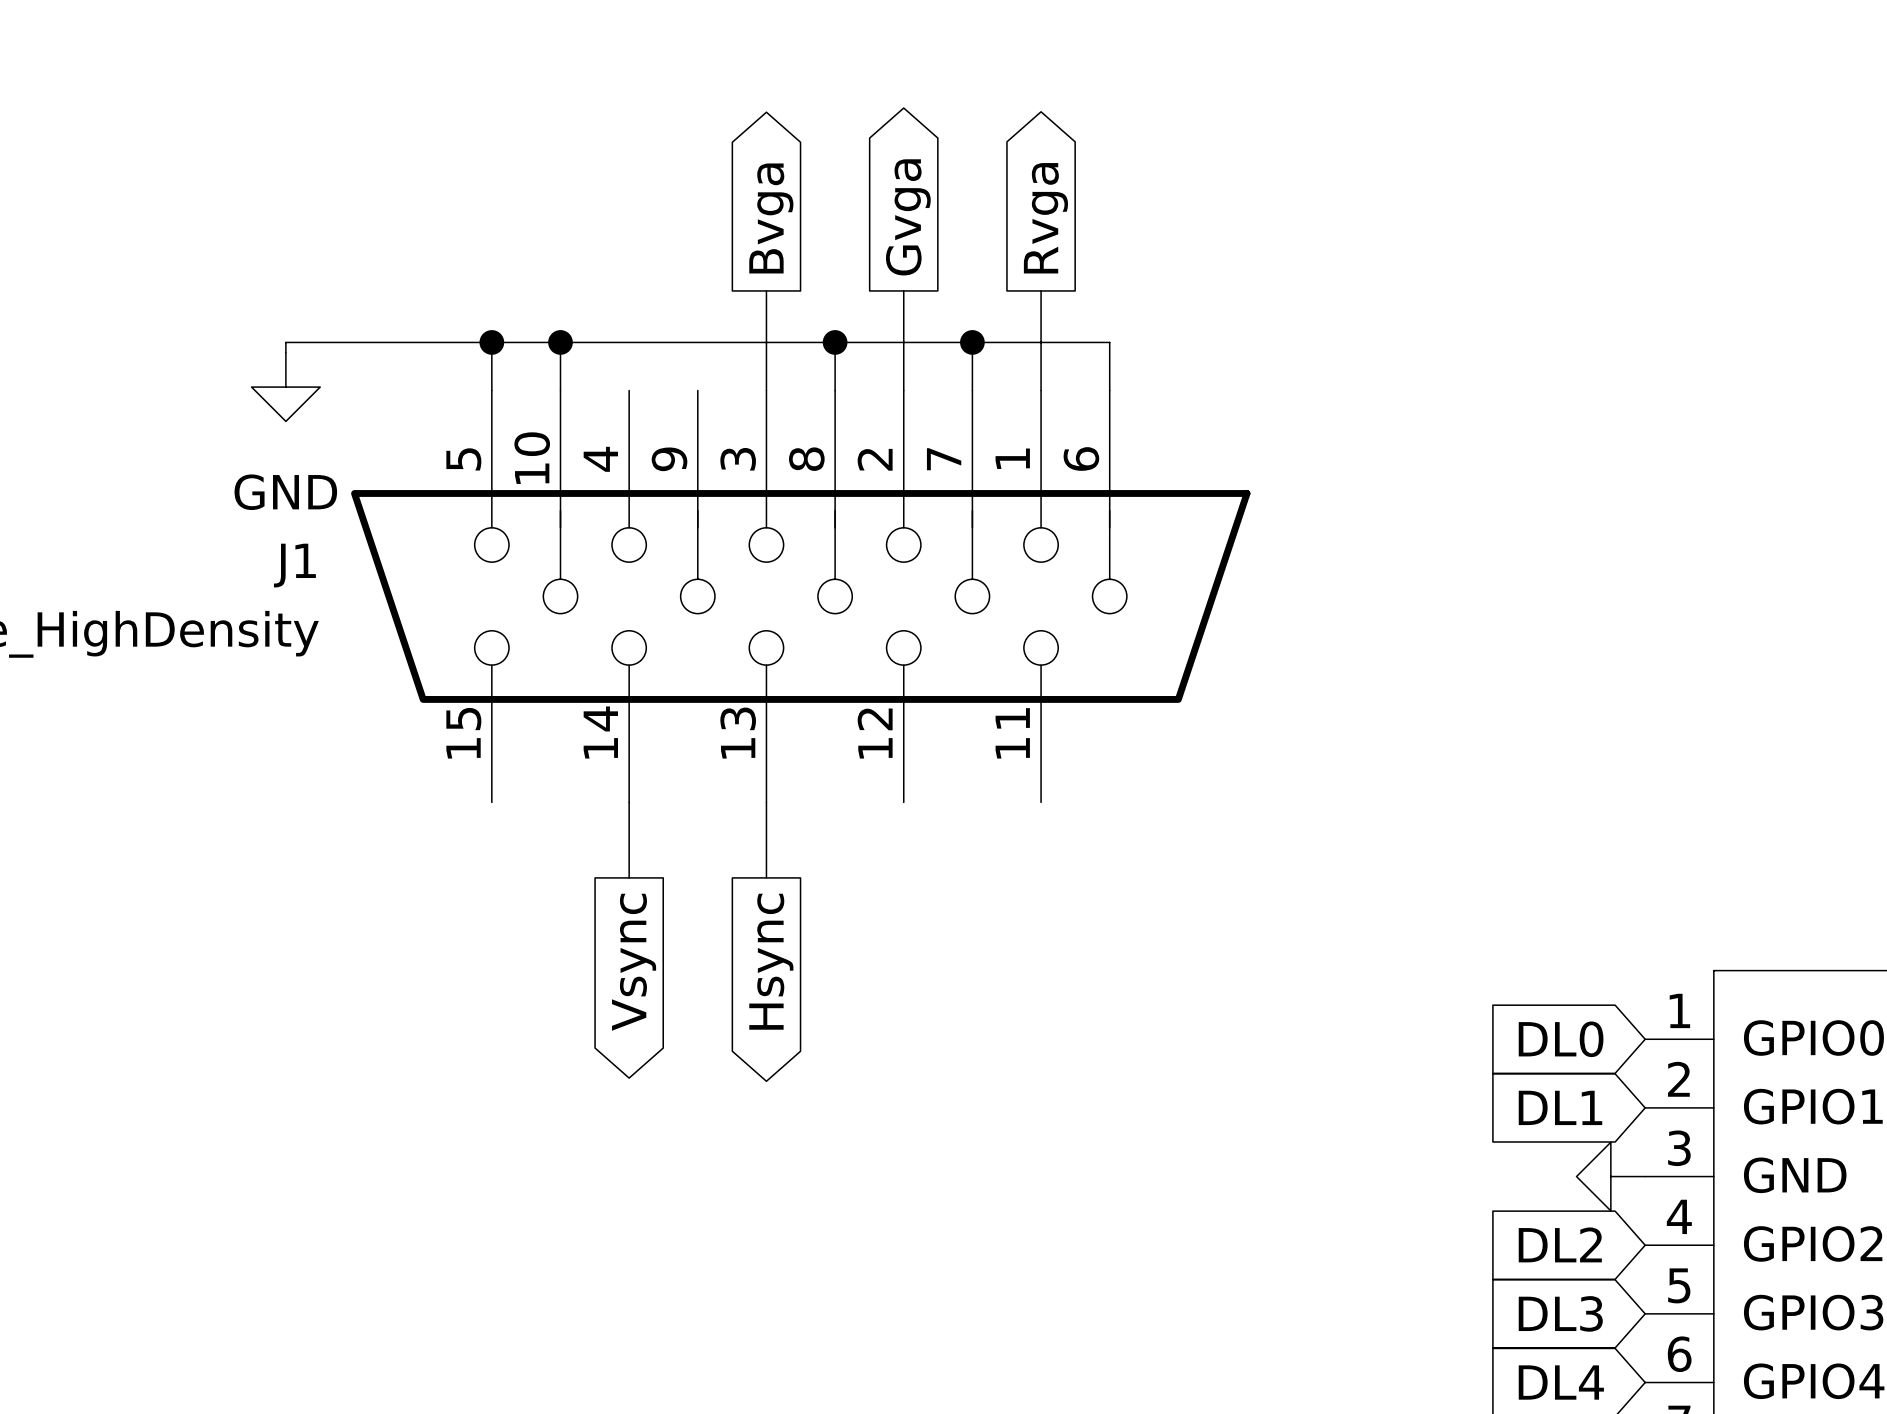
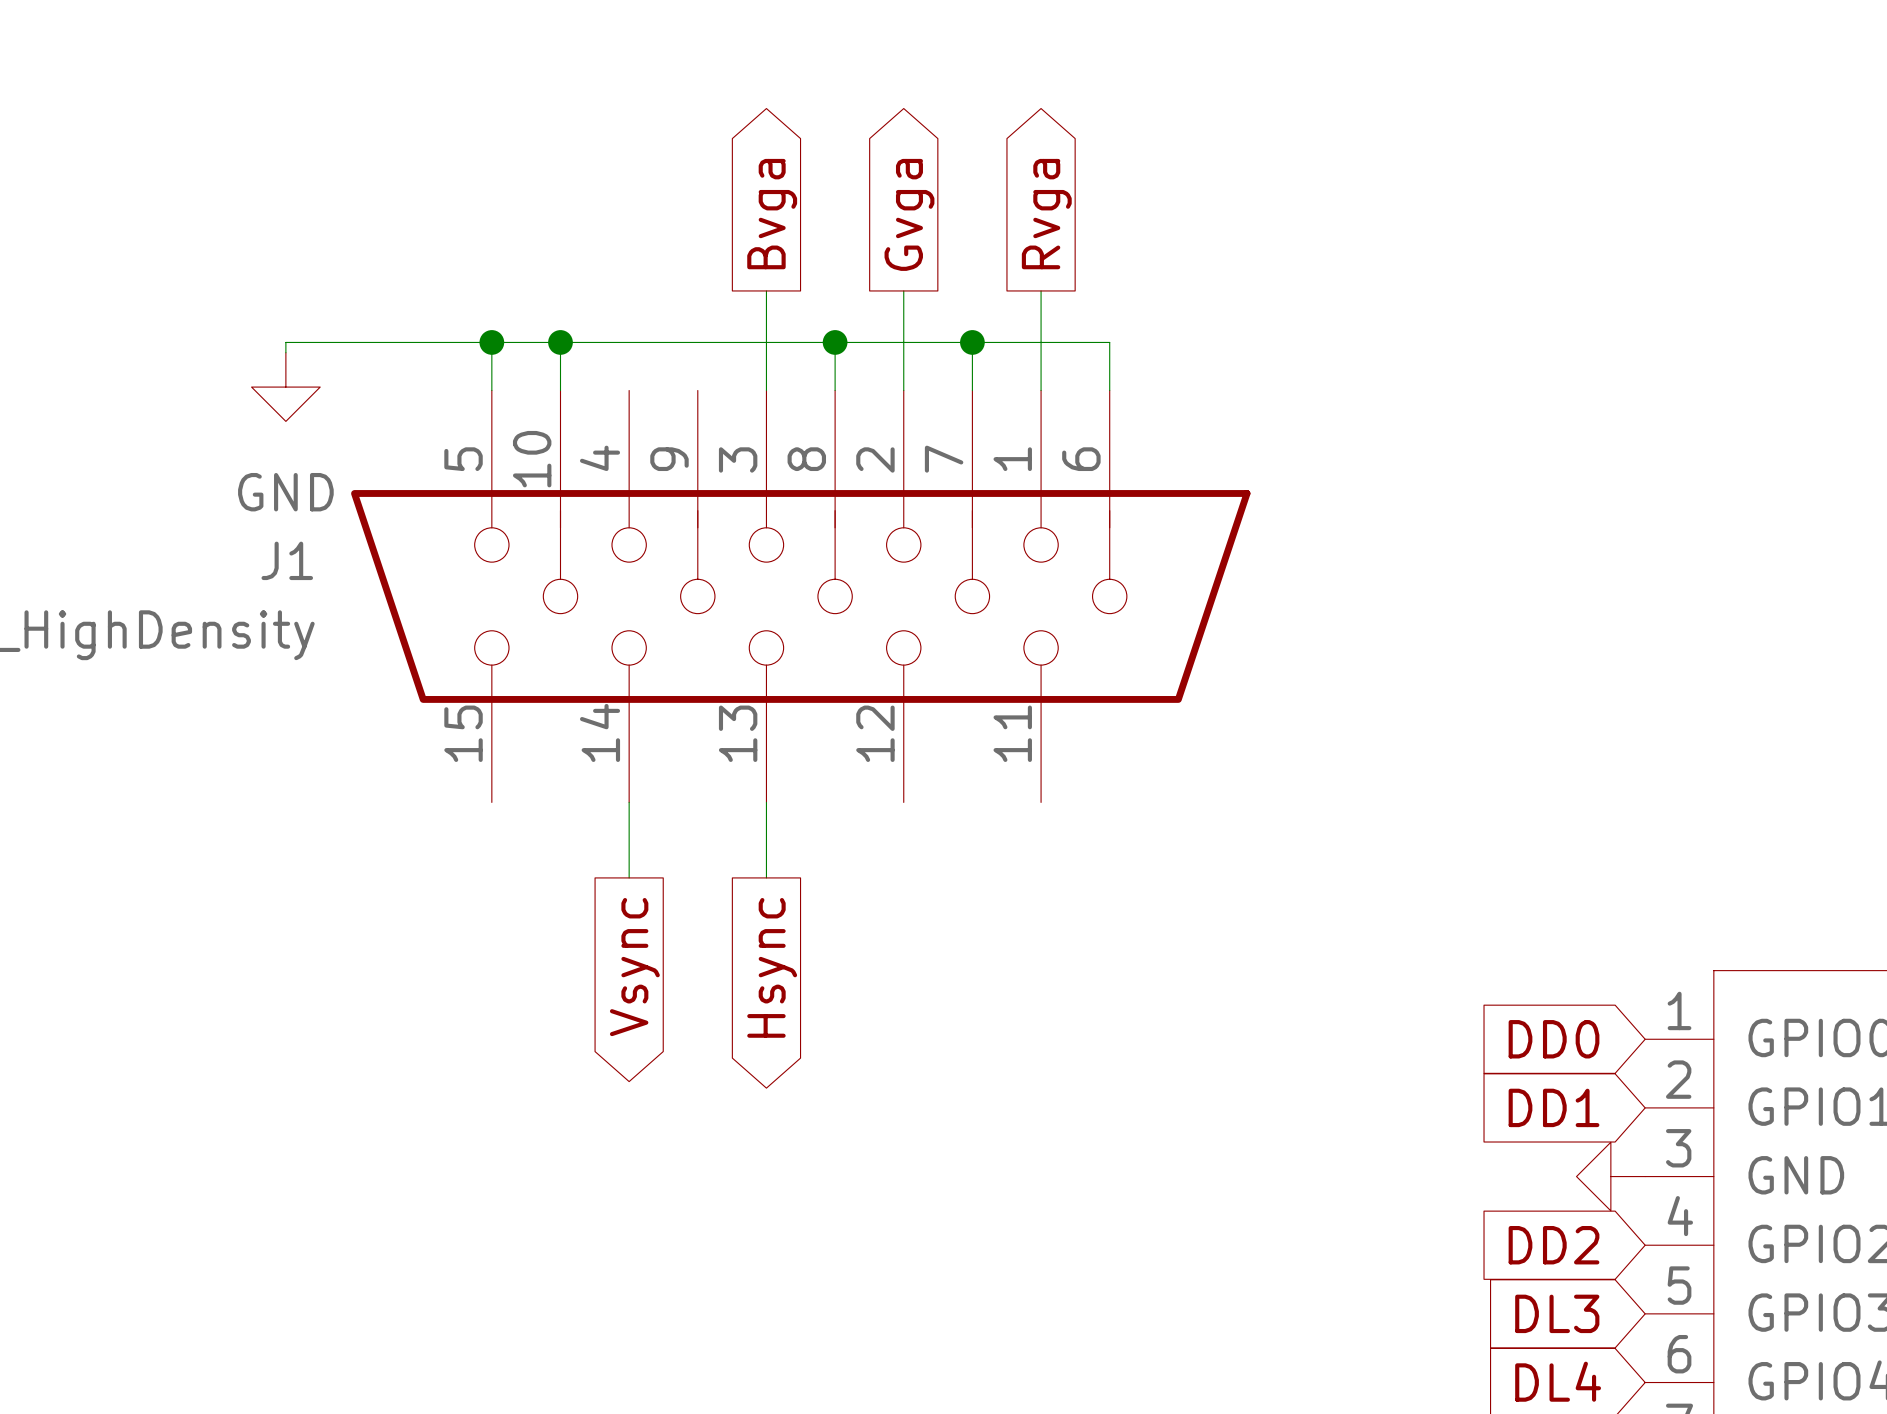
global label: DL0 (1561, 1039) -> DD0 (1554, 1039)
global label: DL1 (1560, 1107) -> DD1 (1554, 1107)
global label: DL2 (1560, 1244) -> DD2 (1554, 1245)

